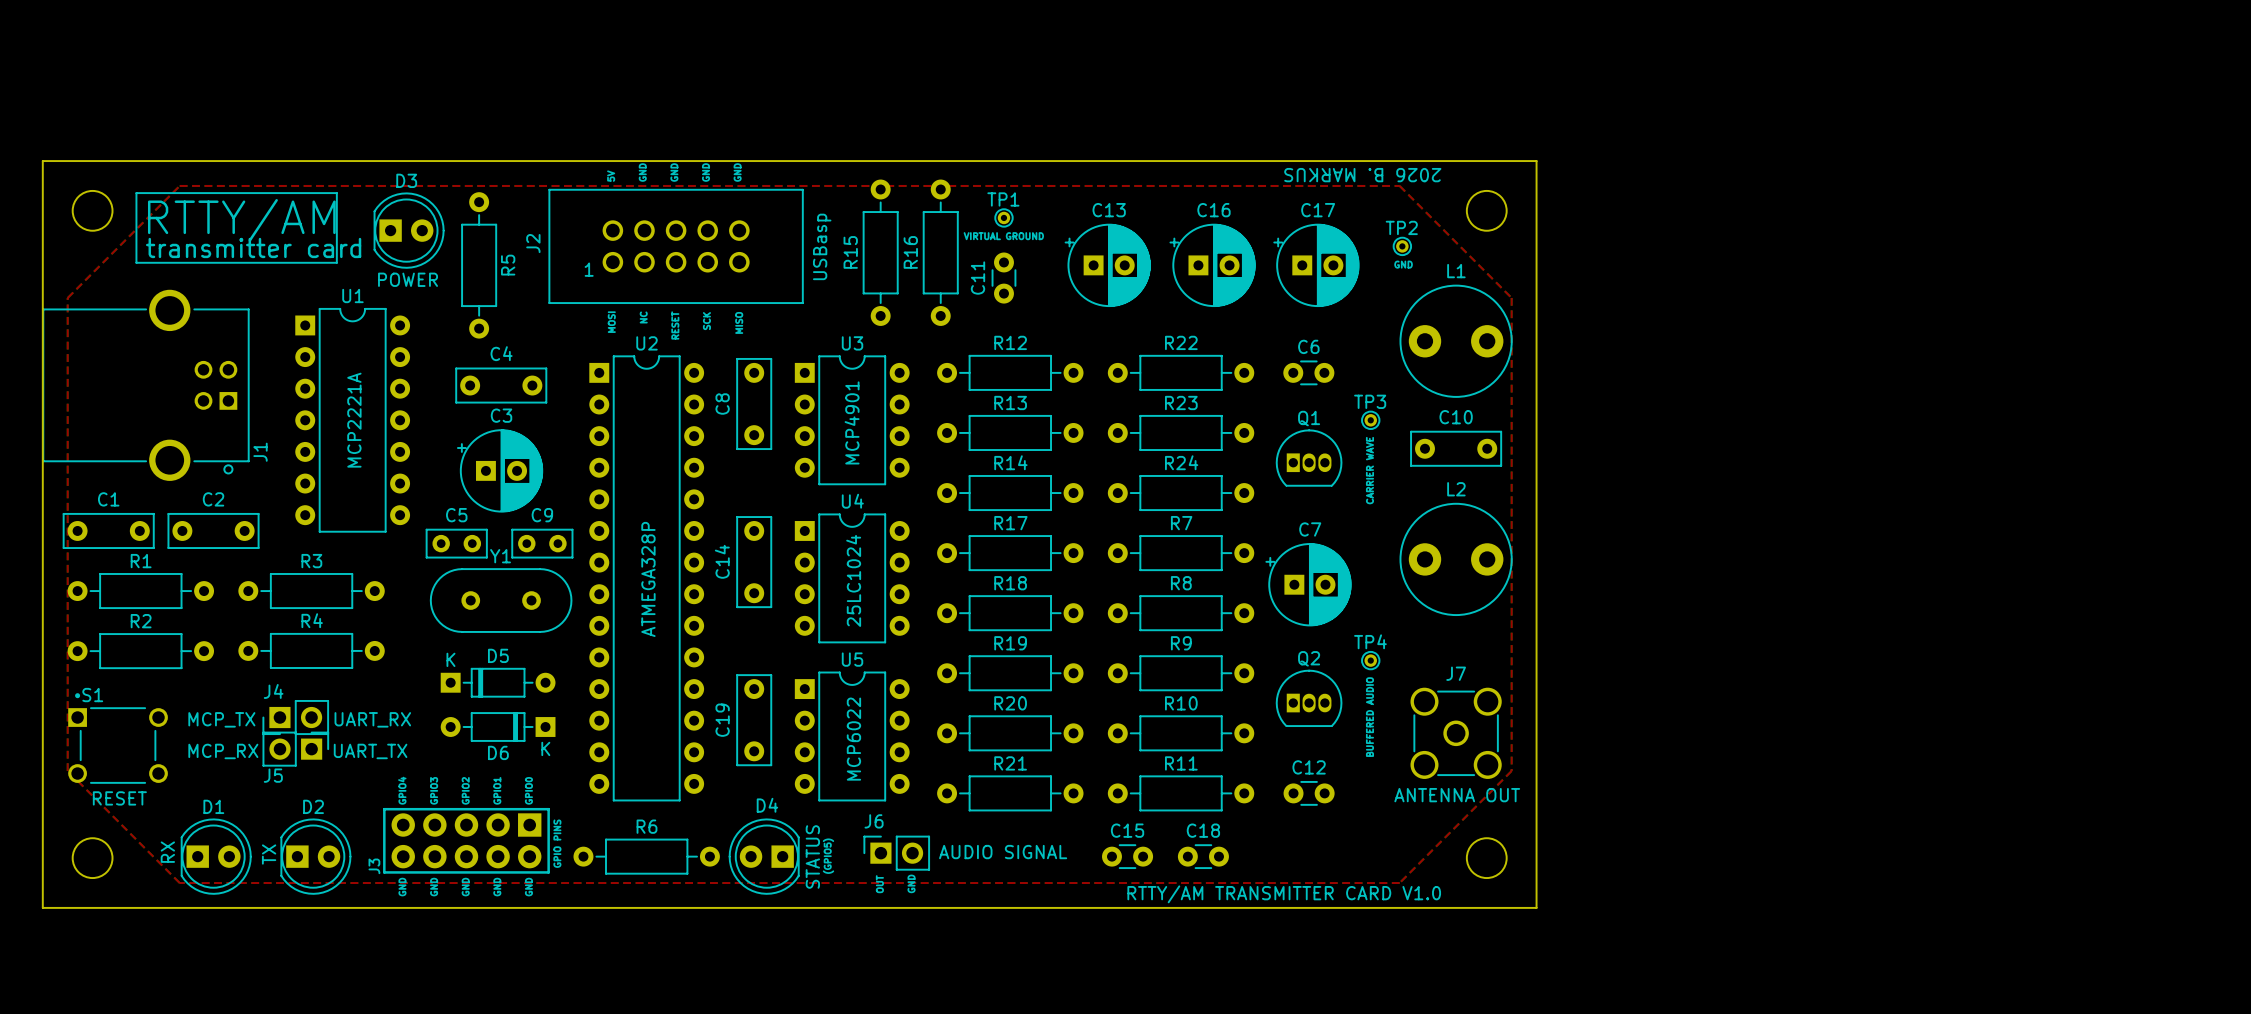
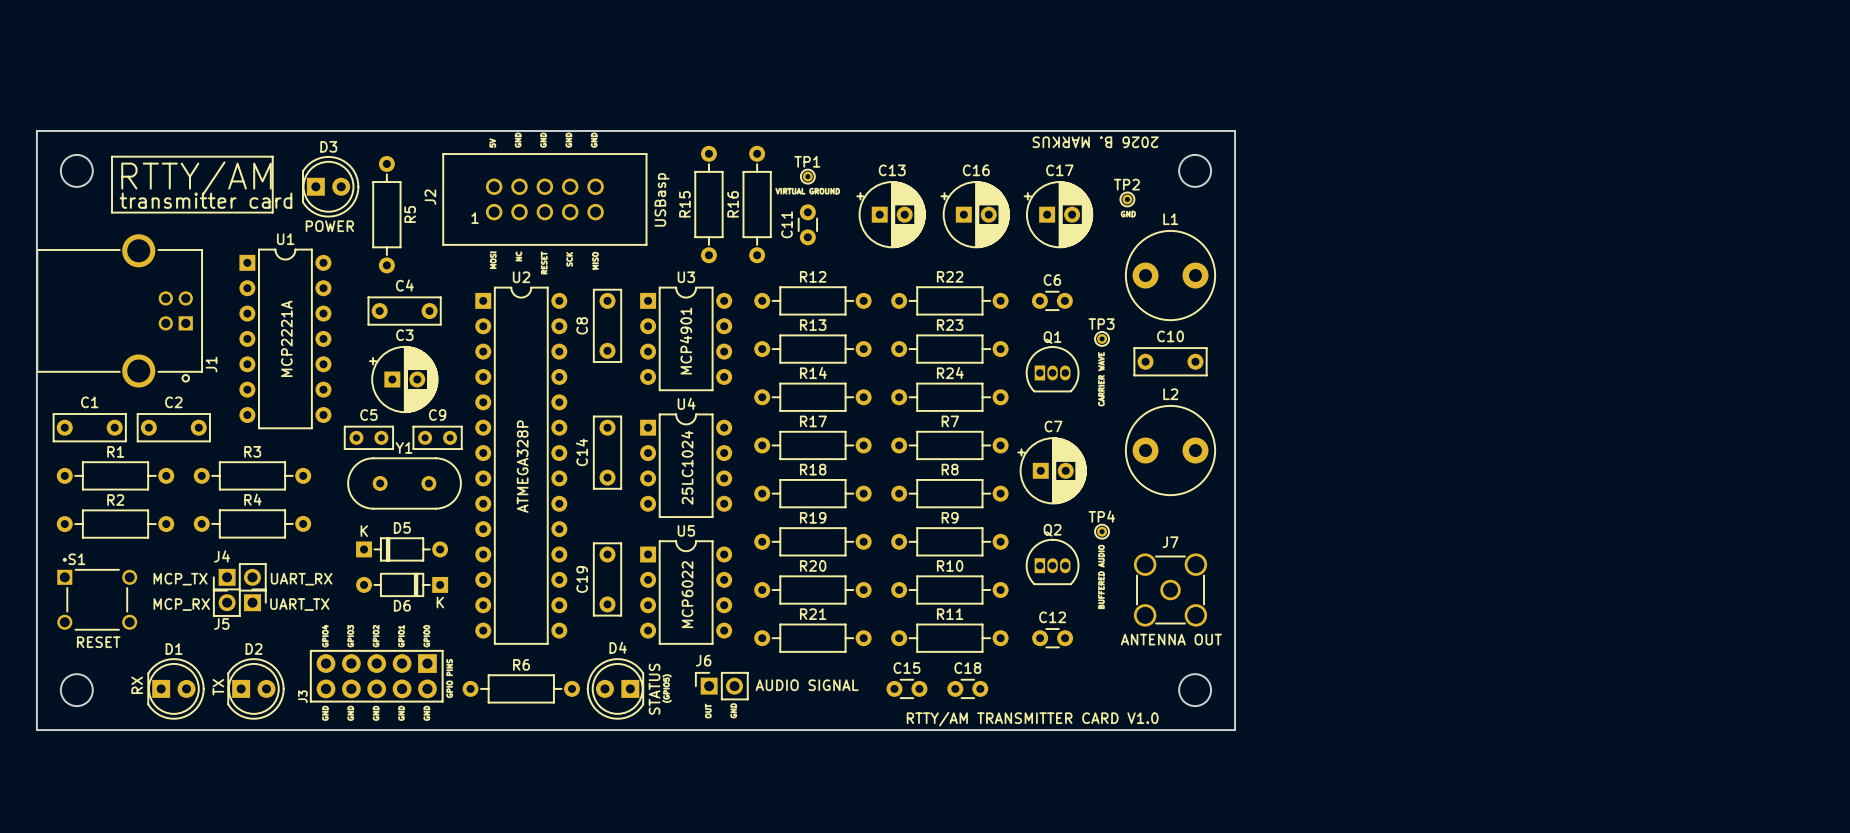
top zone outline: (179, 185) (67, 297) (67, 770) (179, 883) (1399, 883) (1511, 770) (1511, 297) (1399, 185) (179, 185) -> none

